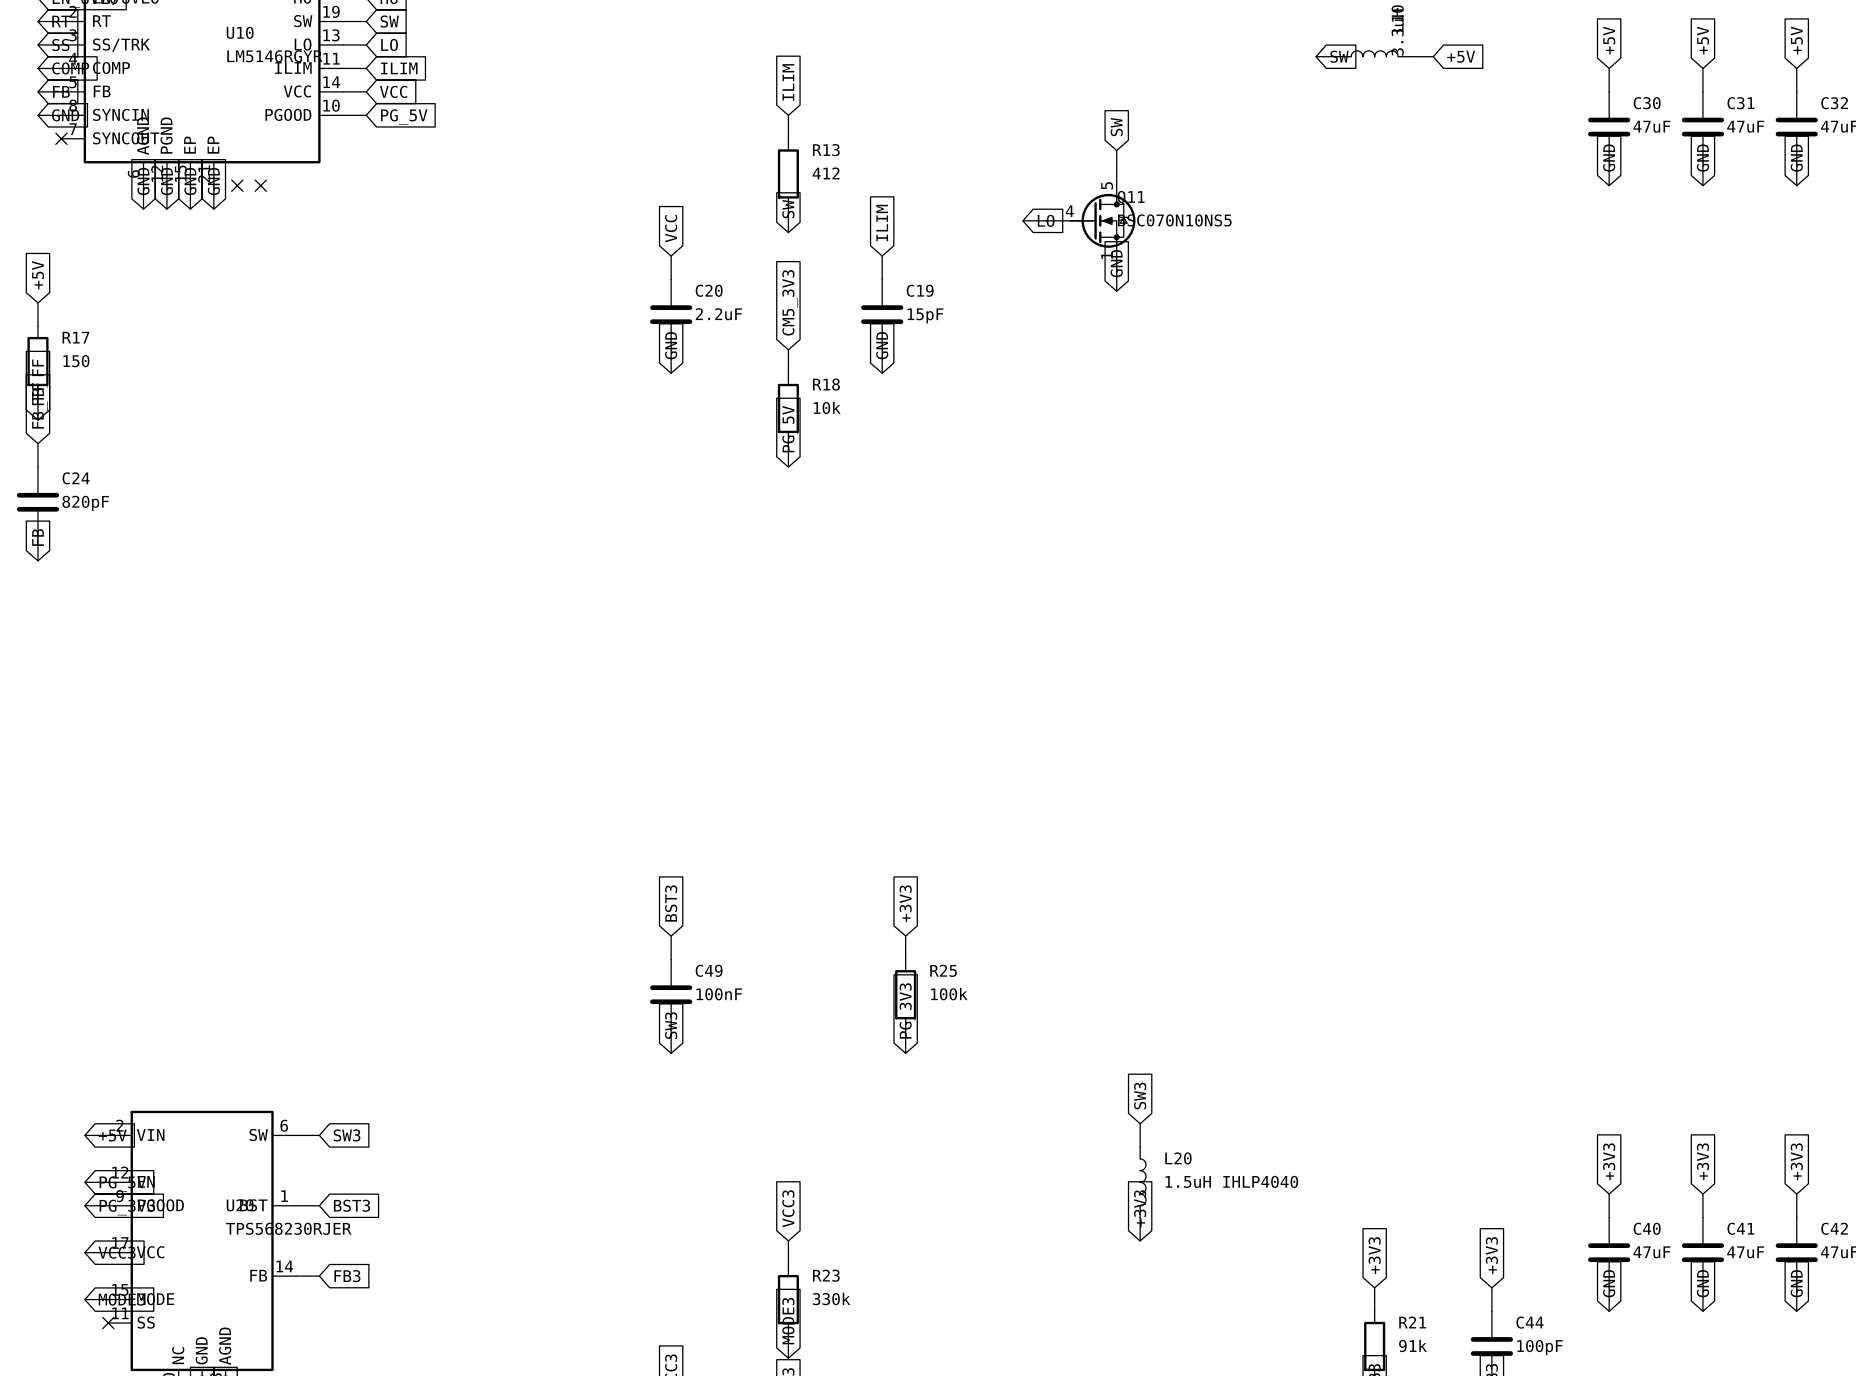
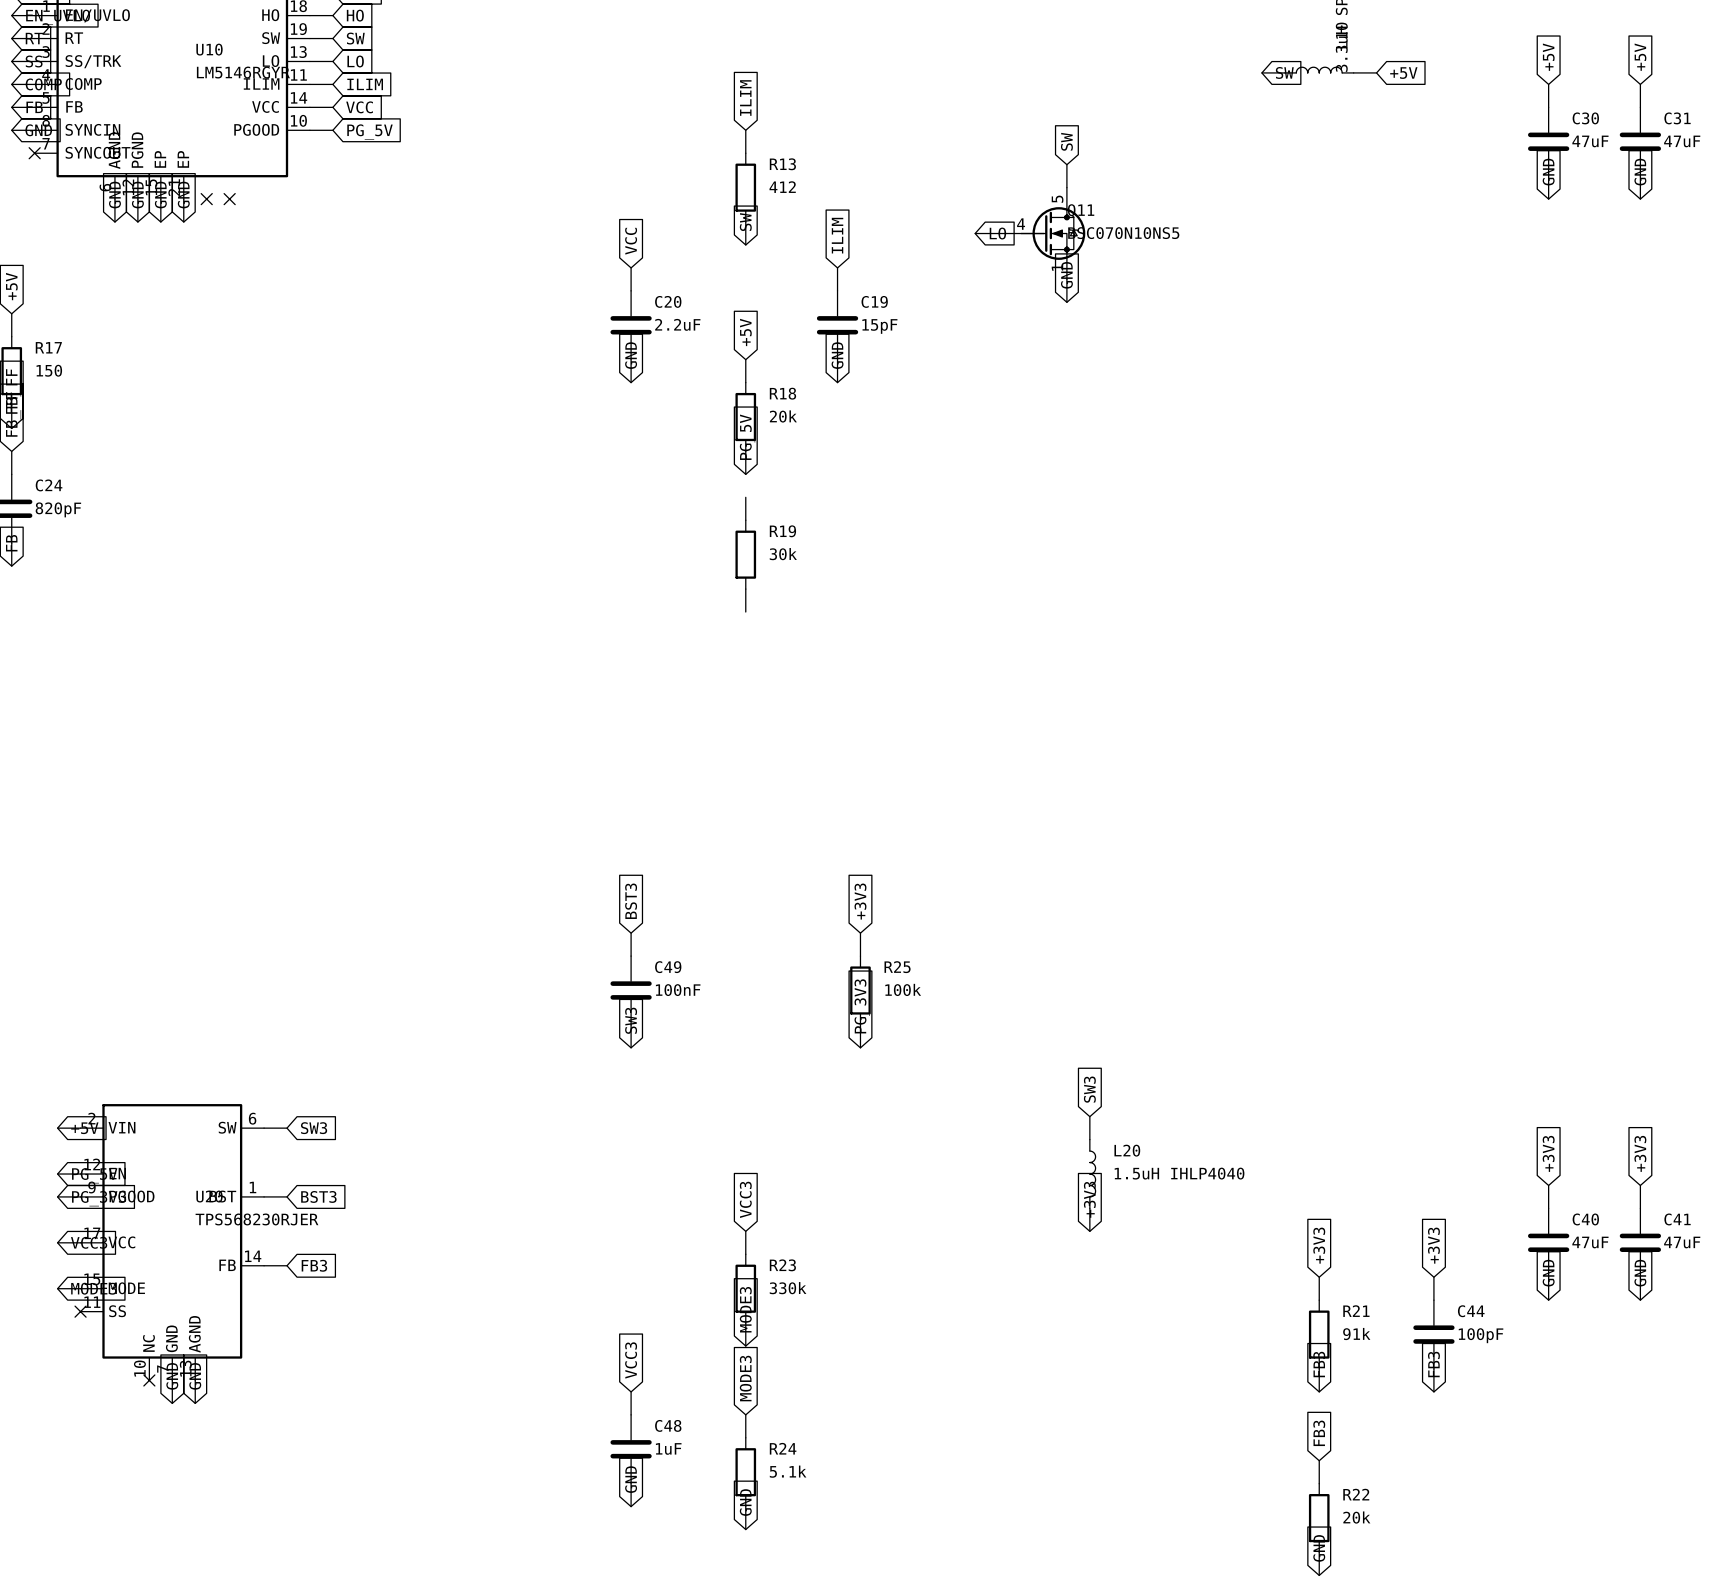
global label: CM5_3V3 (790, 302) -> +5V (745, 332)
R18 value: 10k (827, 407) -> 20k (783, 416)
wire: none -> (745, 497) (745, 520)
R19: none -> 30k (745, 554)
wire: none -> (745, 589) (745, 612)

